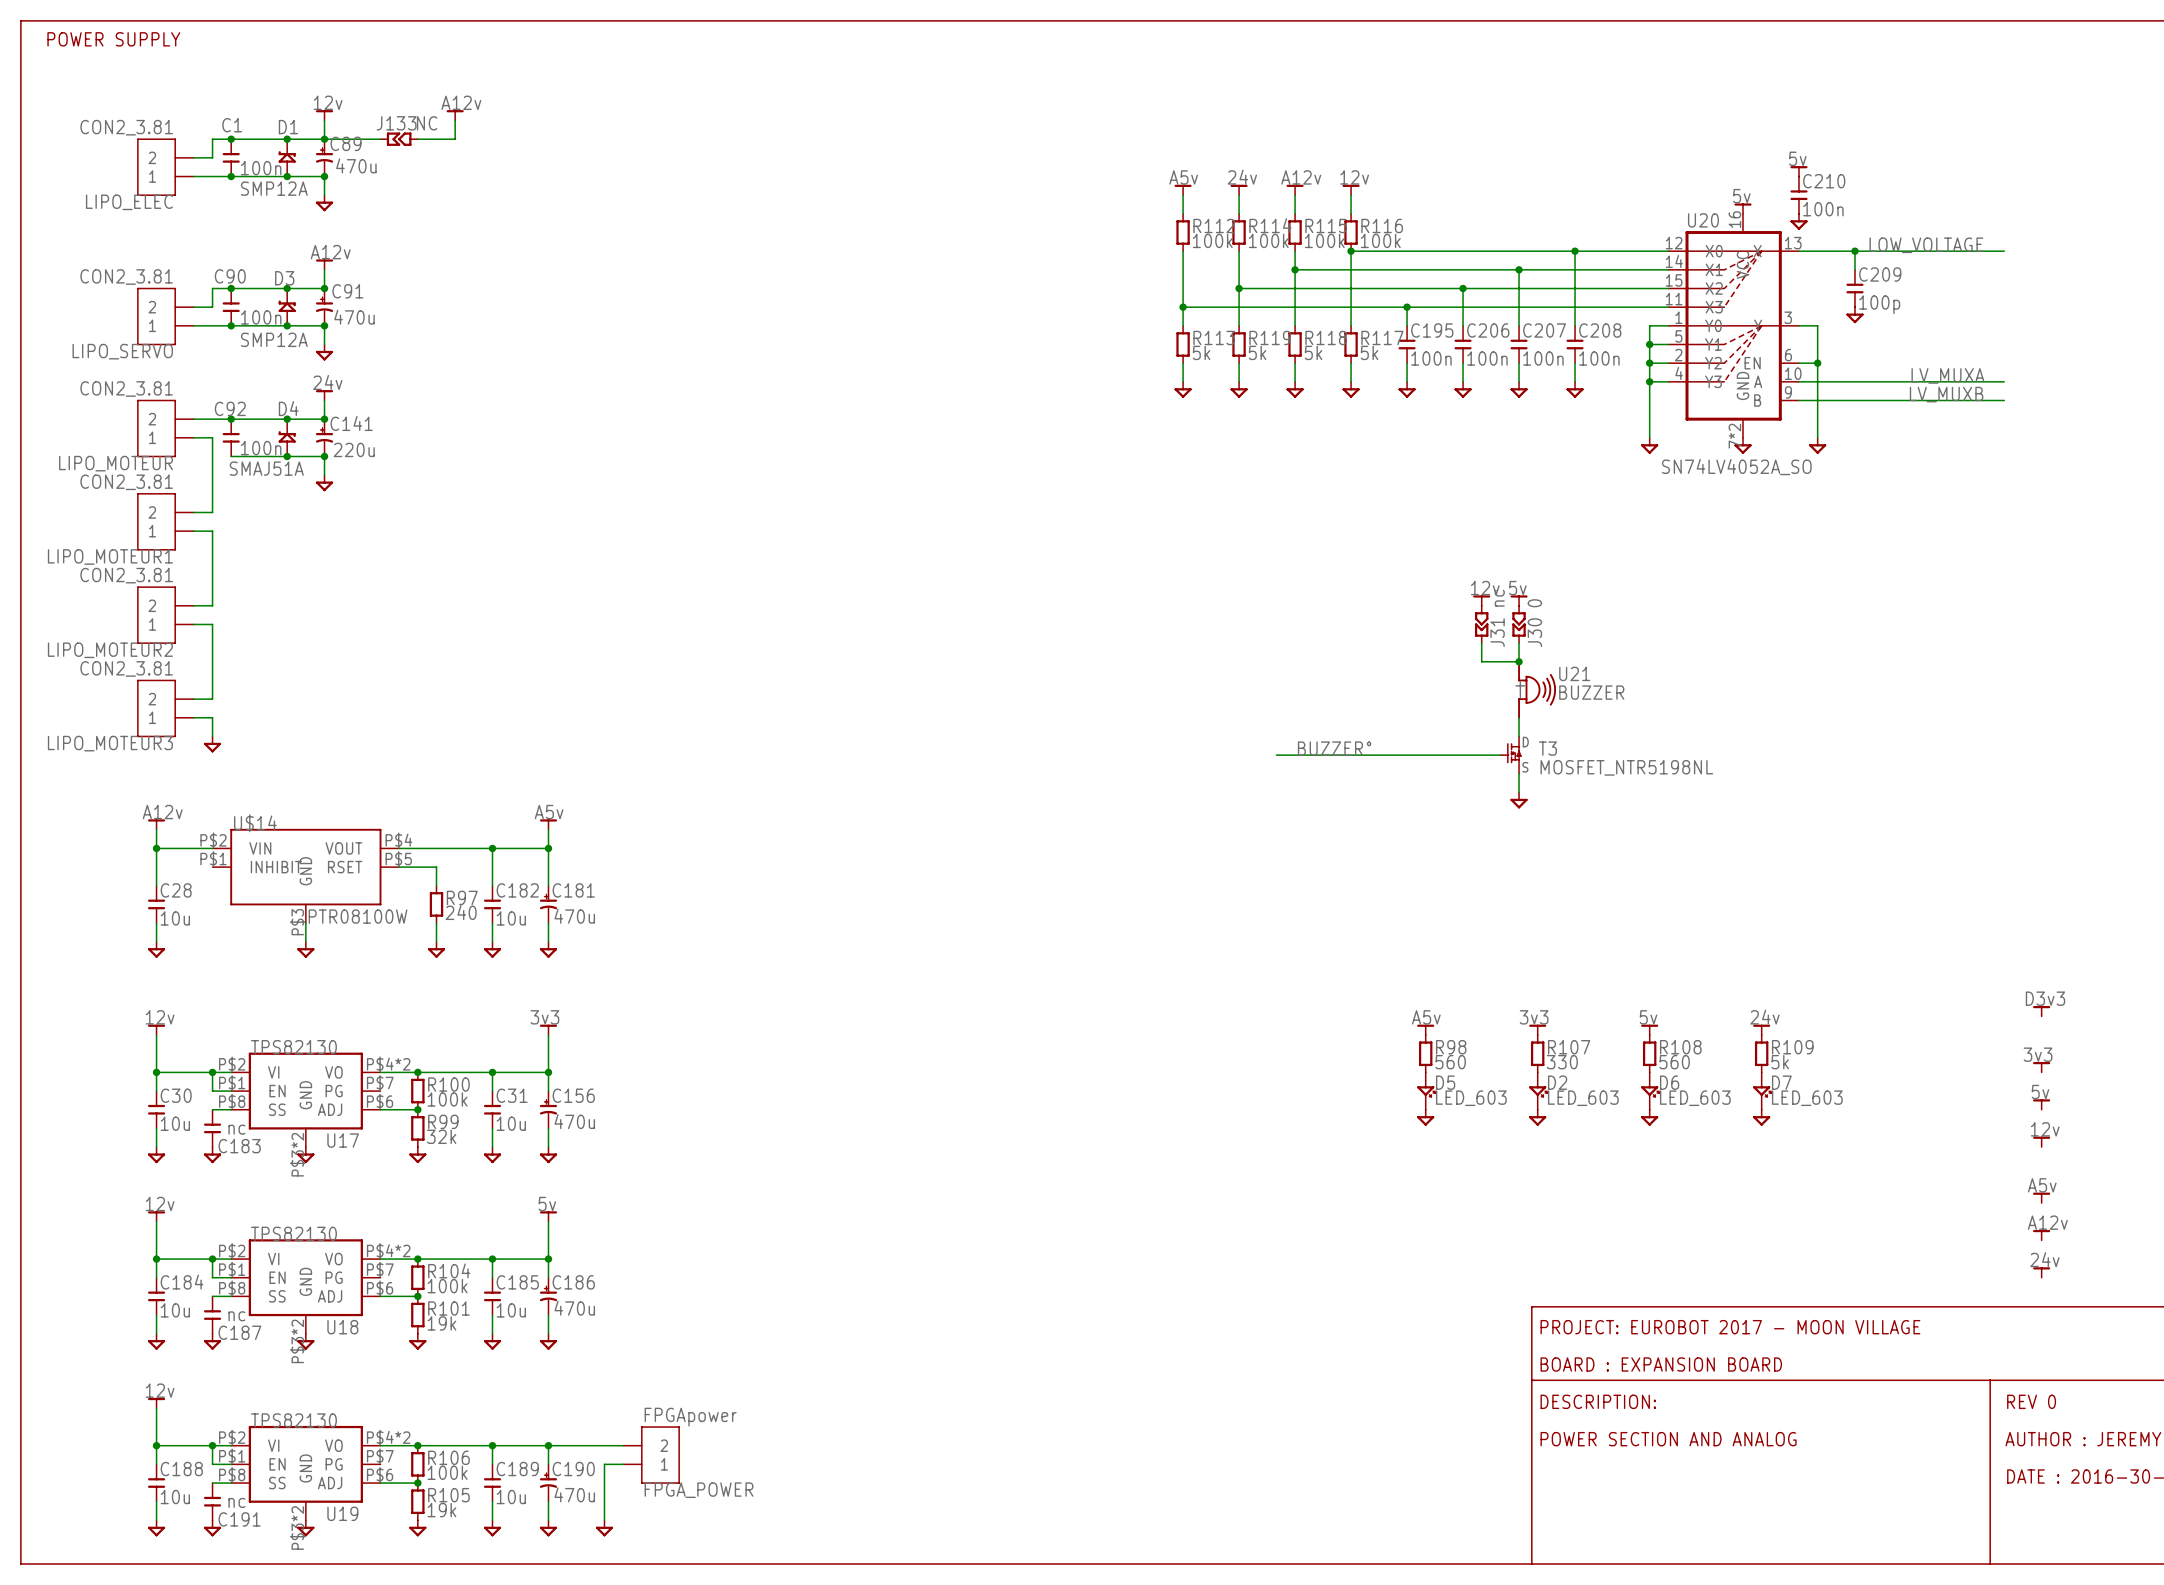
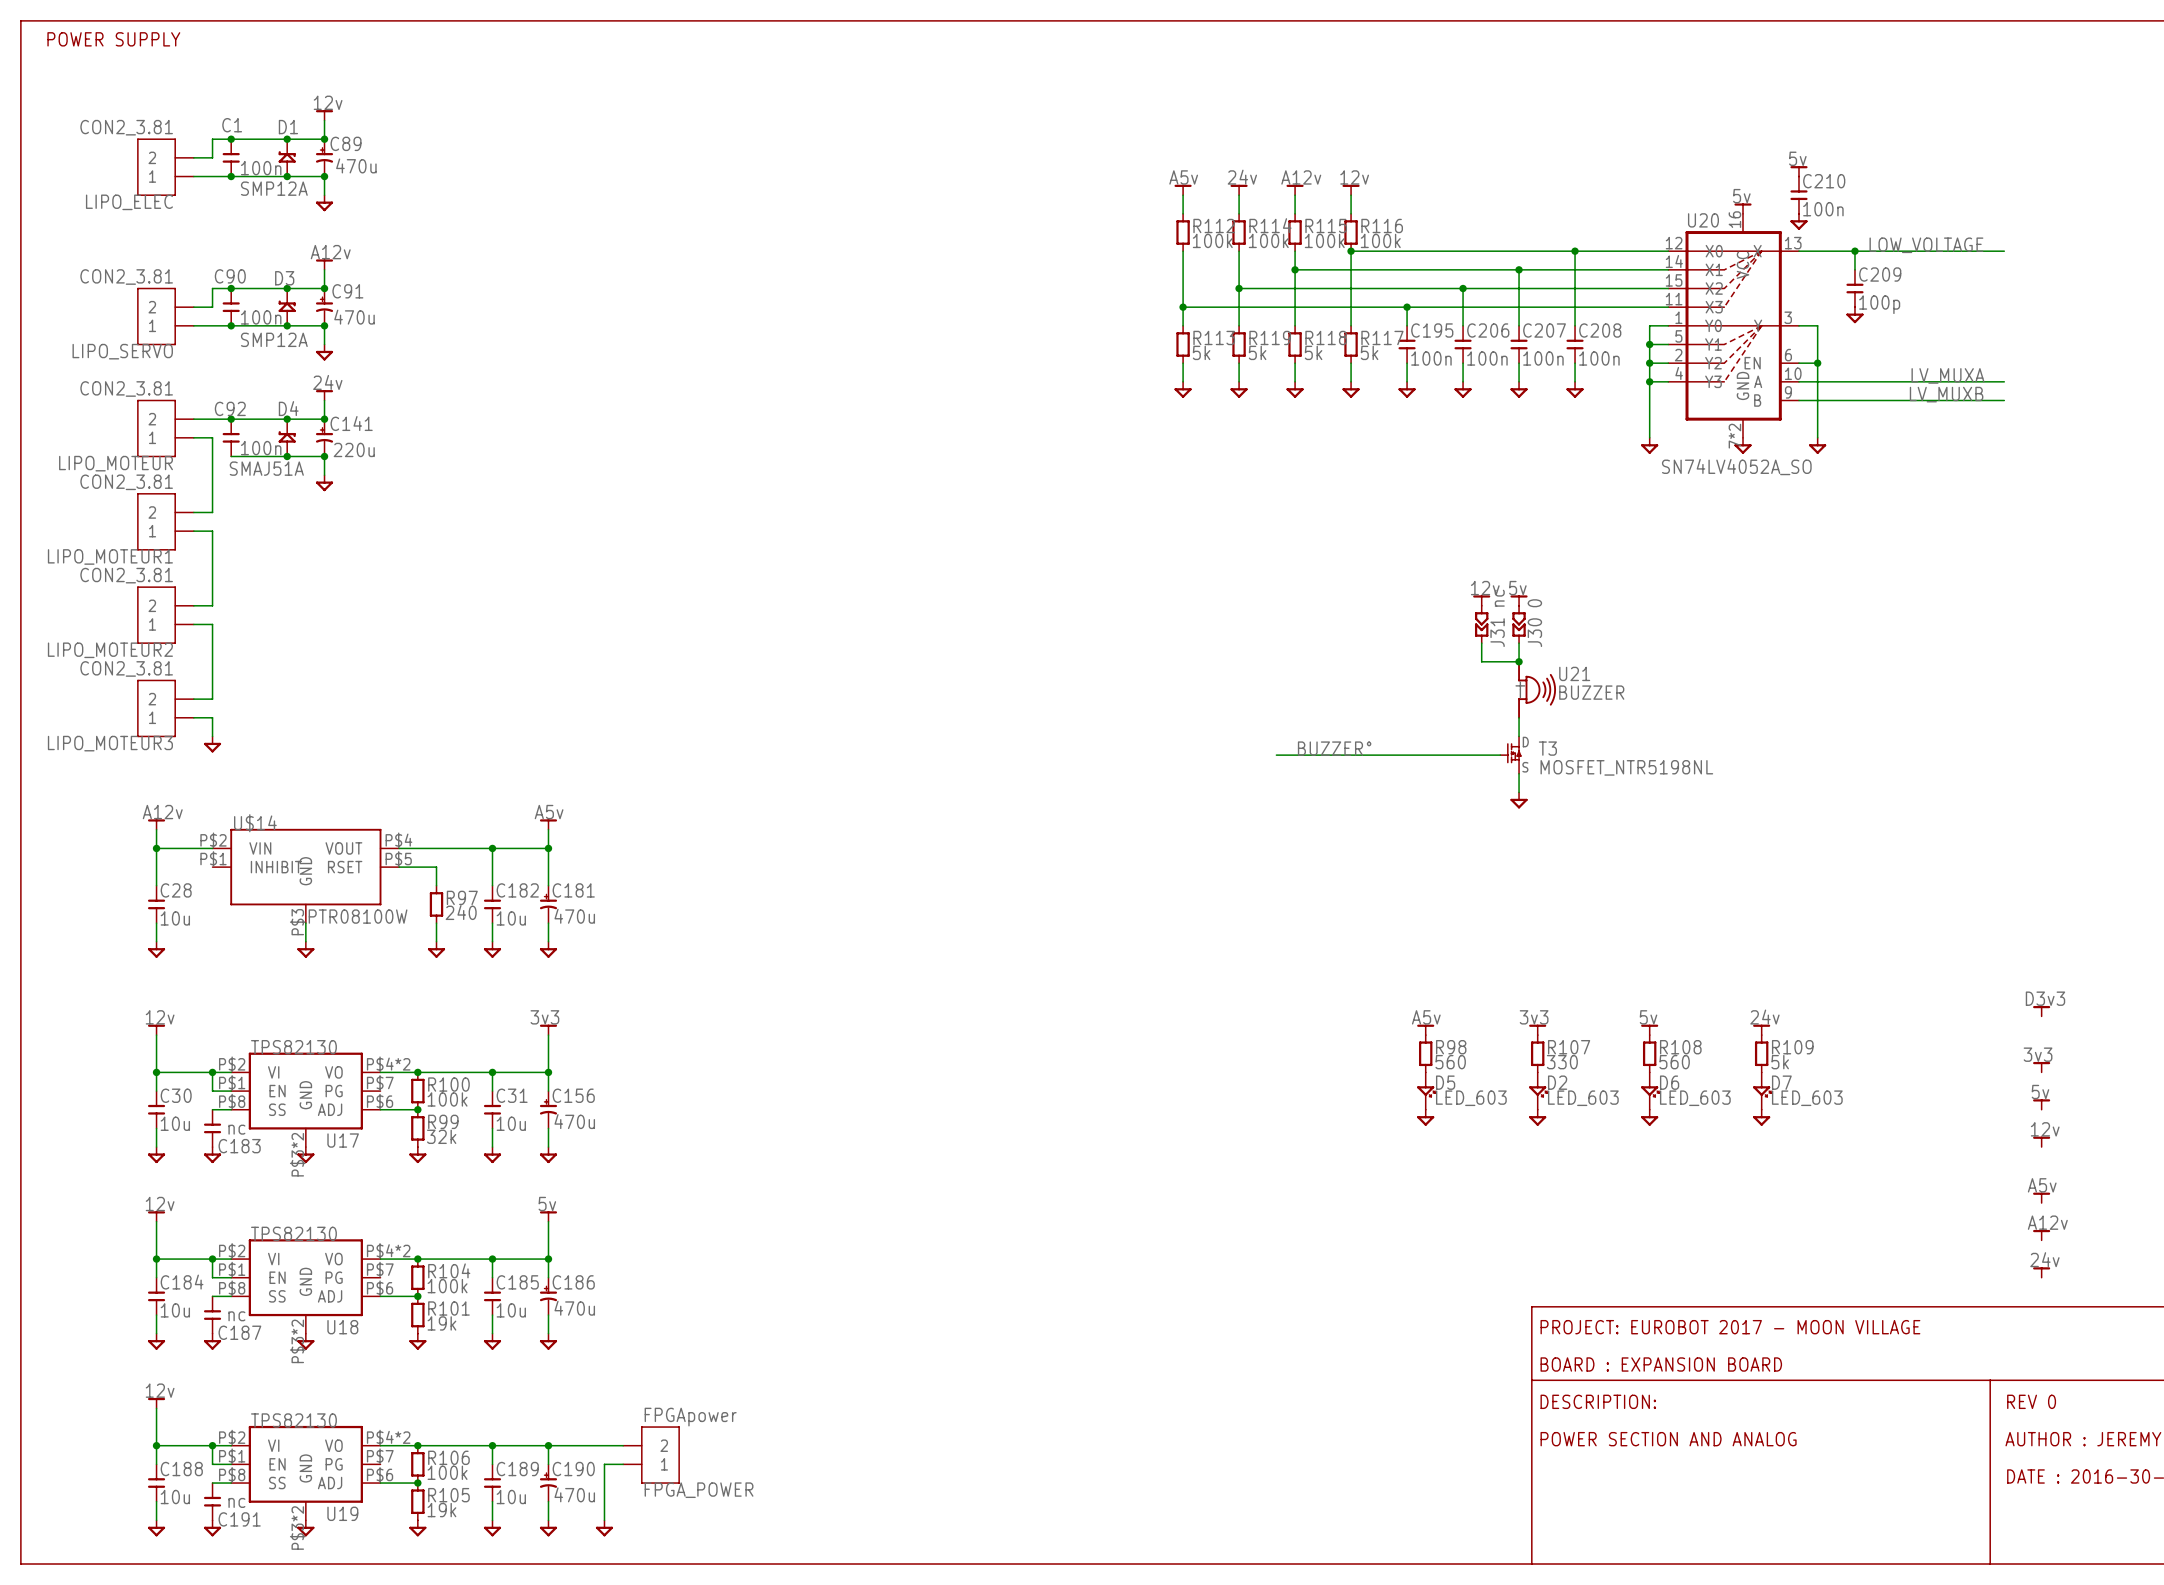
power symbol: (455, 115) -> none
wire: (455, 120) (455, 139) (417, 139) -> none
wire: (324, 139) (380, 139) -> none
J133: NC (399, 139) -> none

